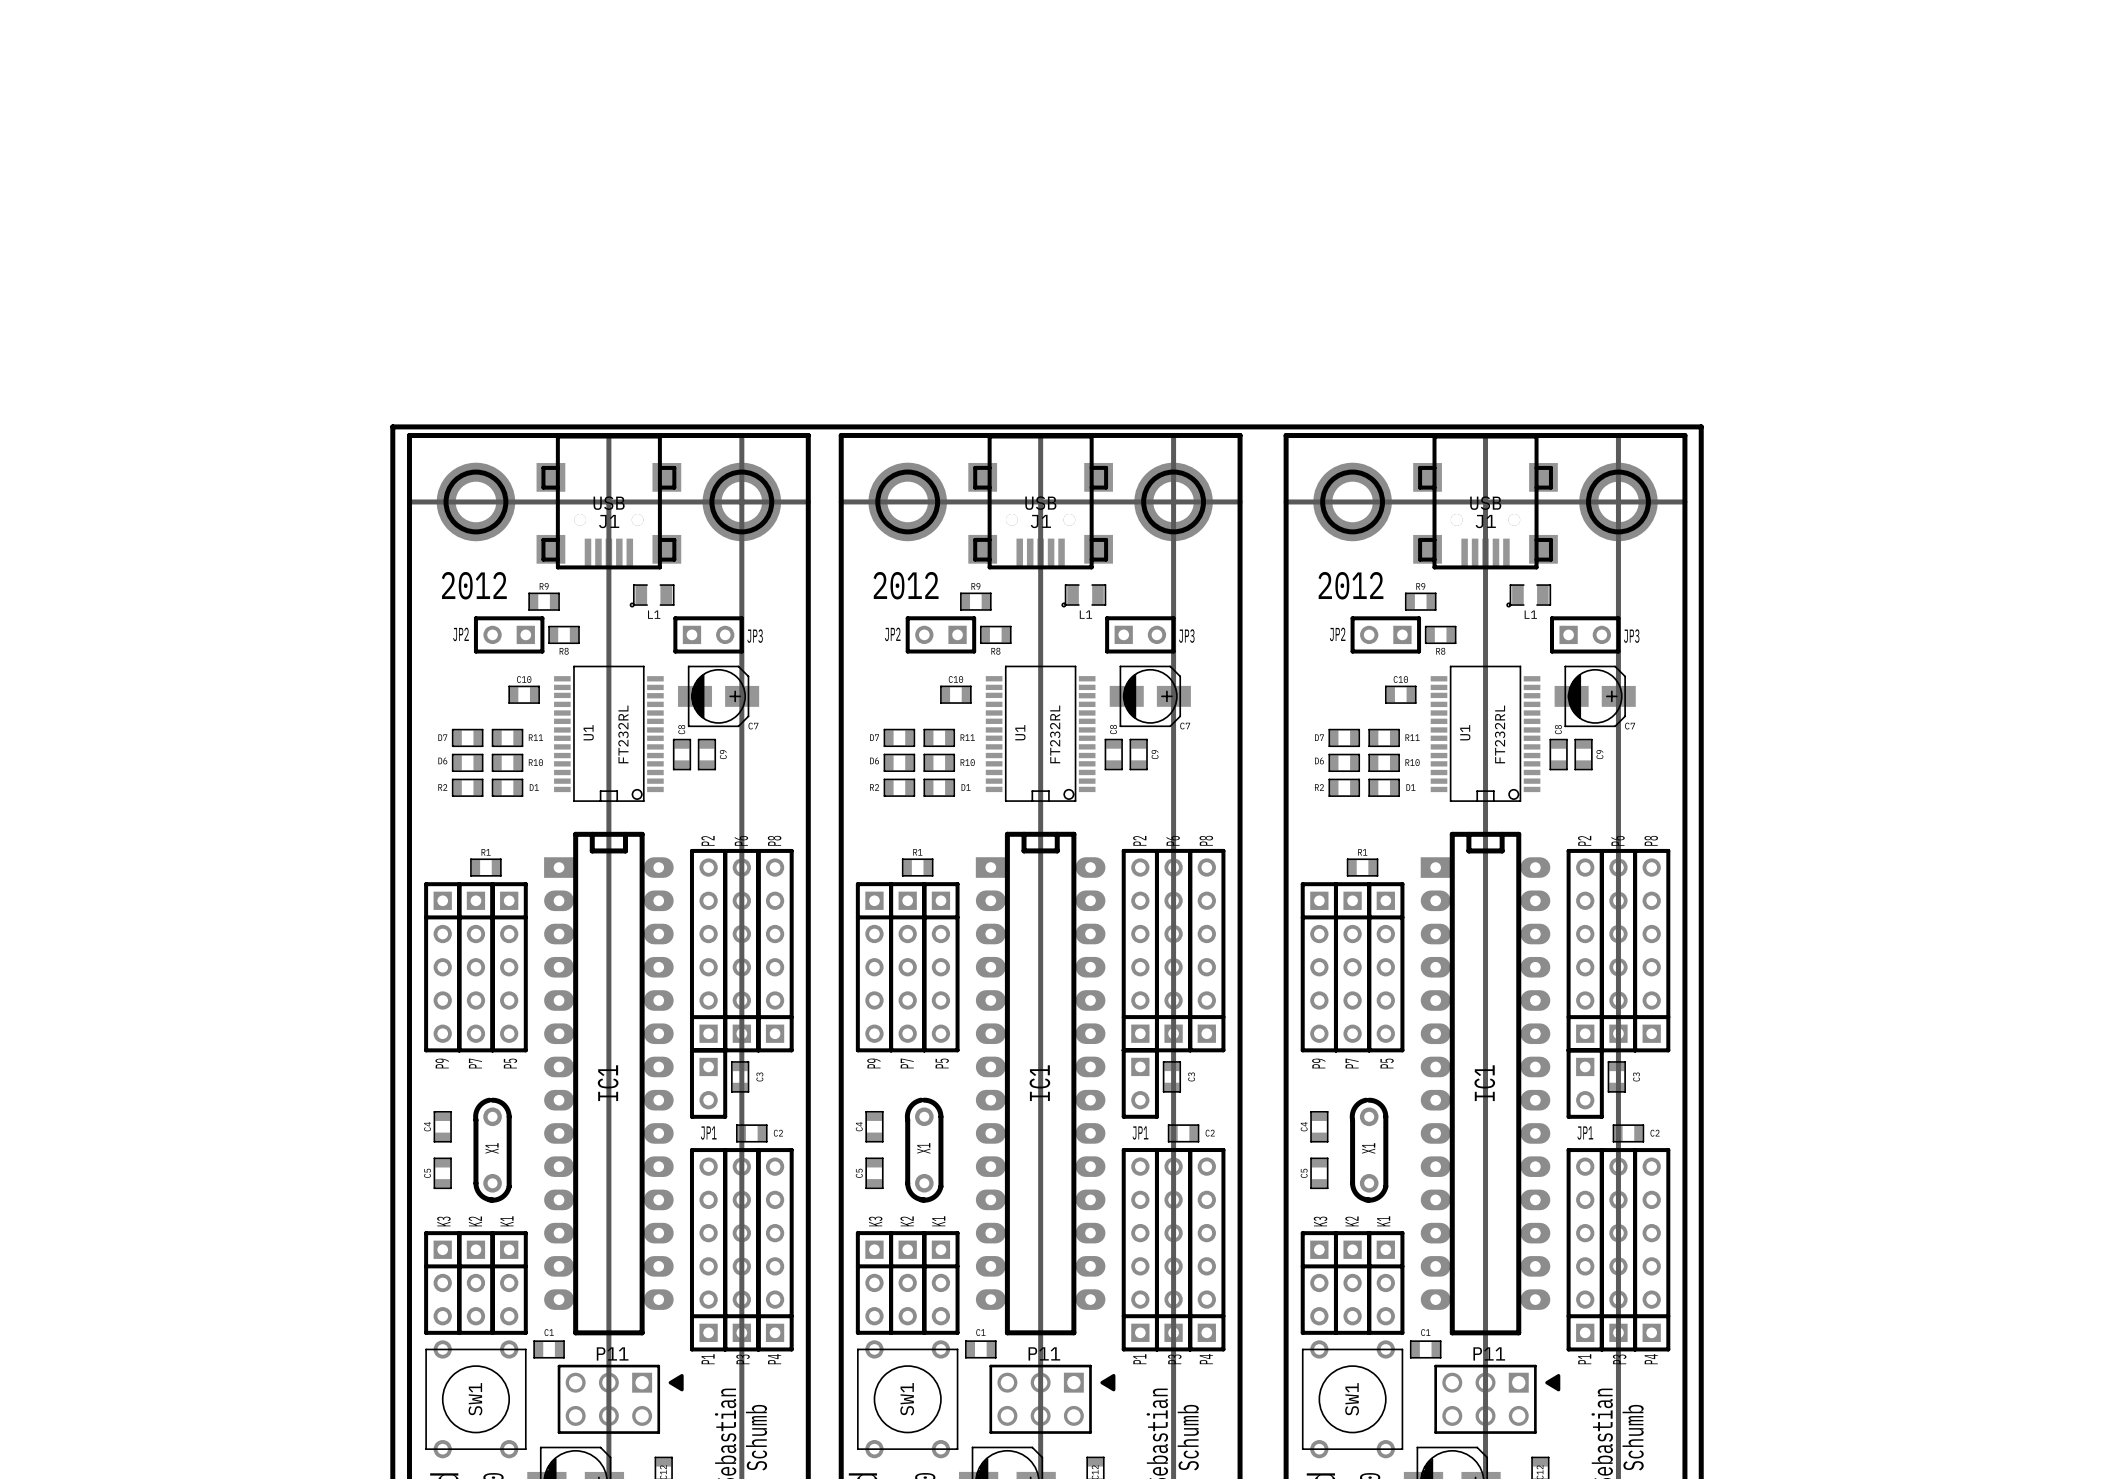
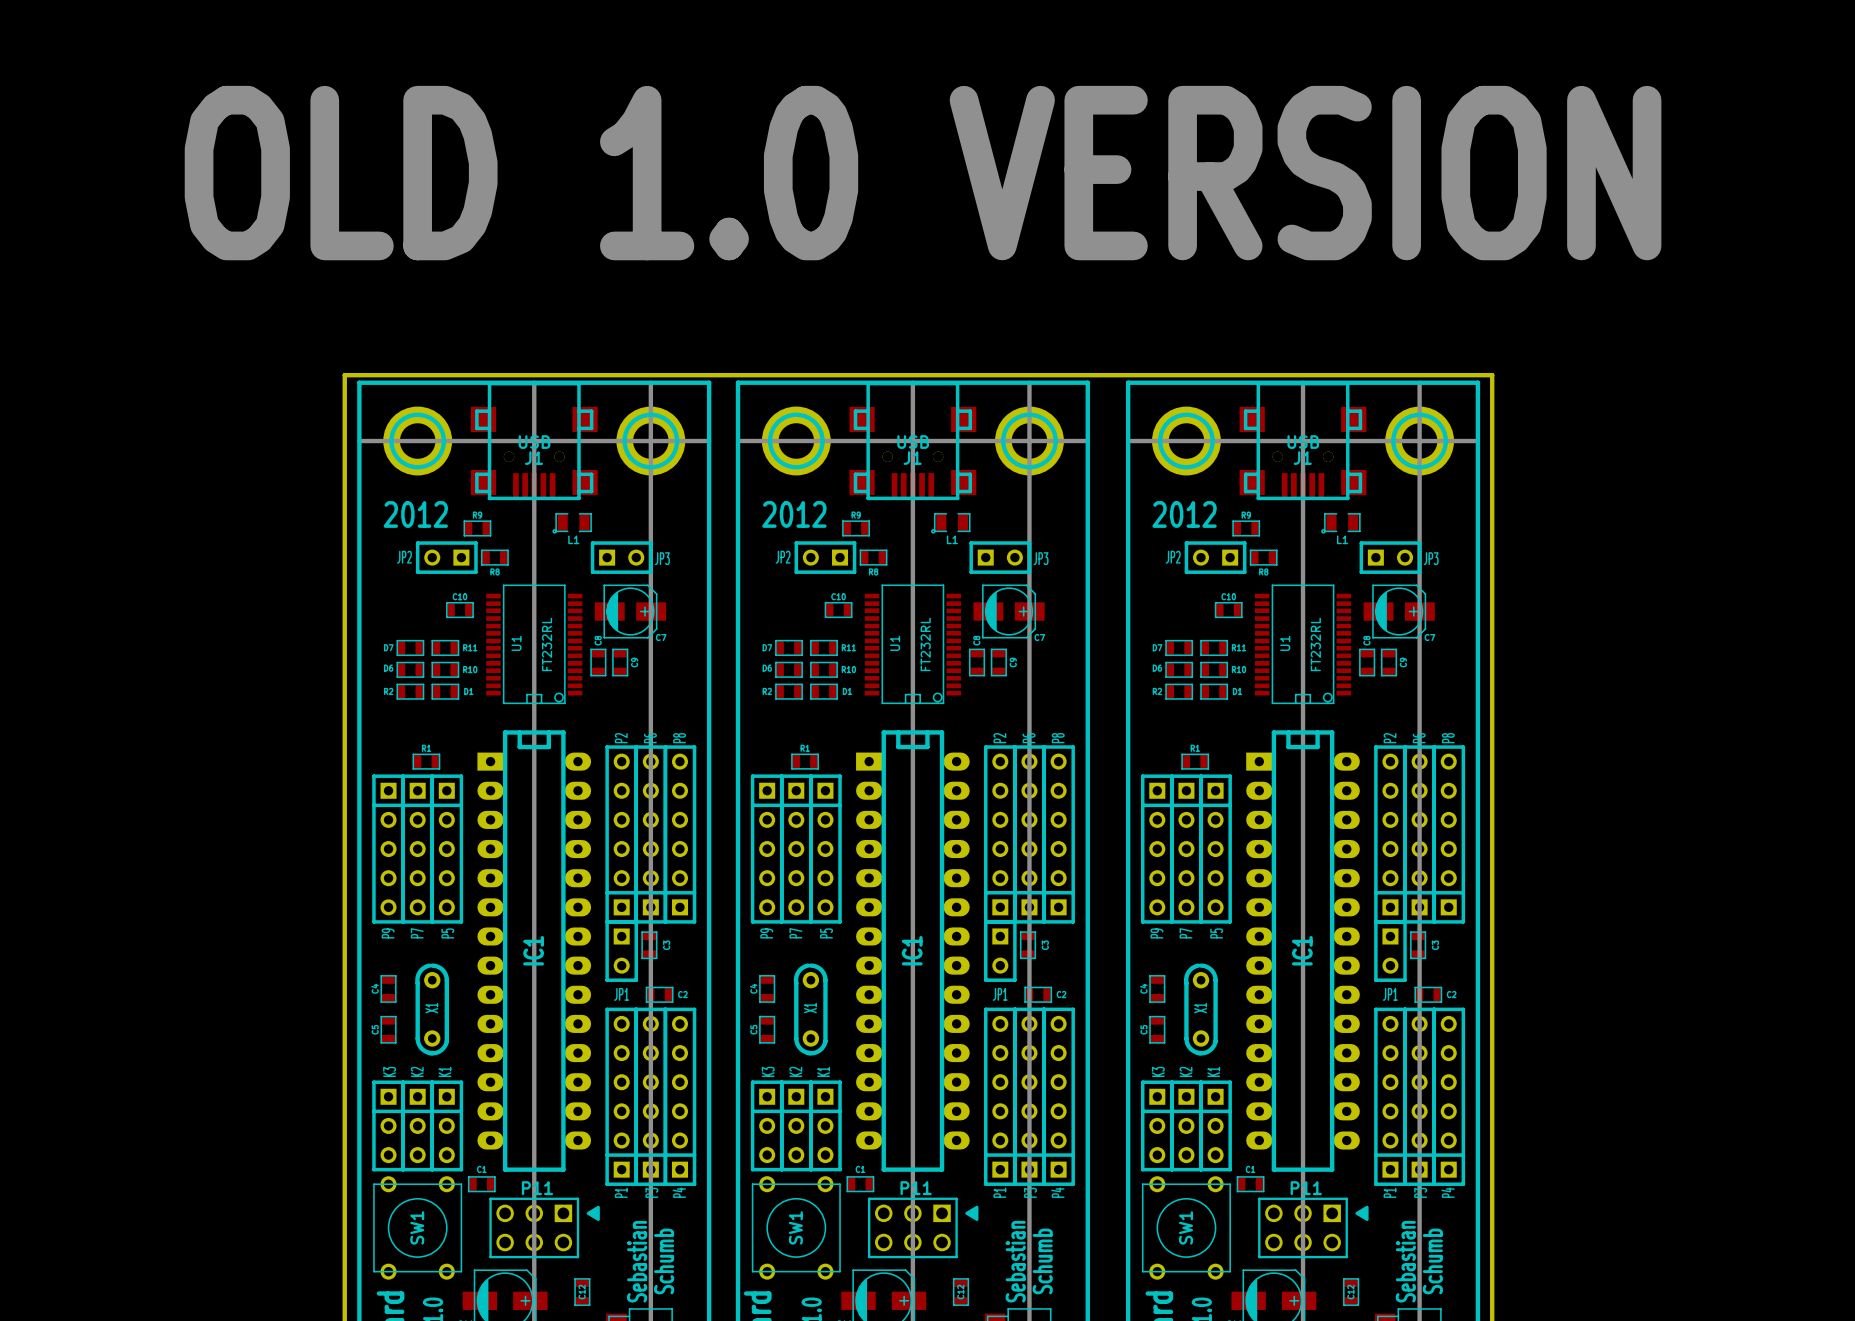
text: none -> OLD 1.0 VERSION (923, 173)

